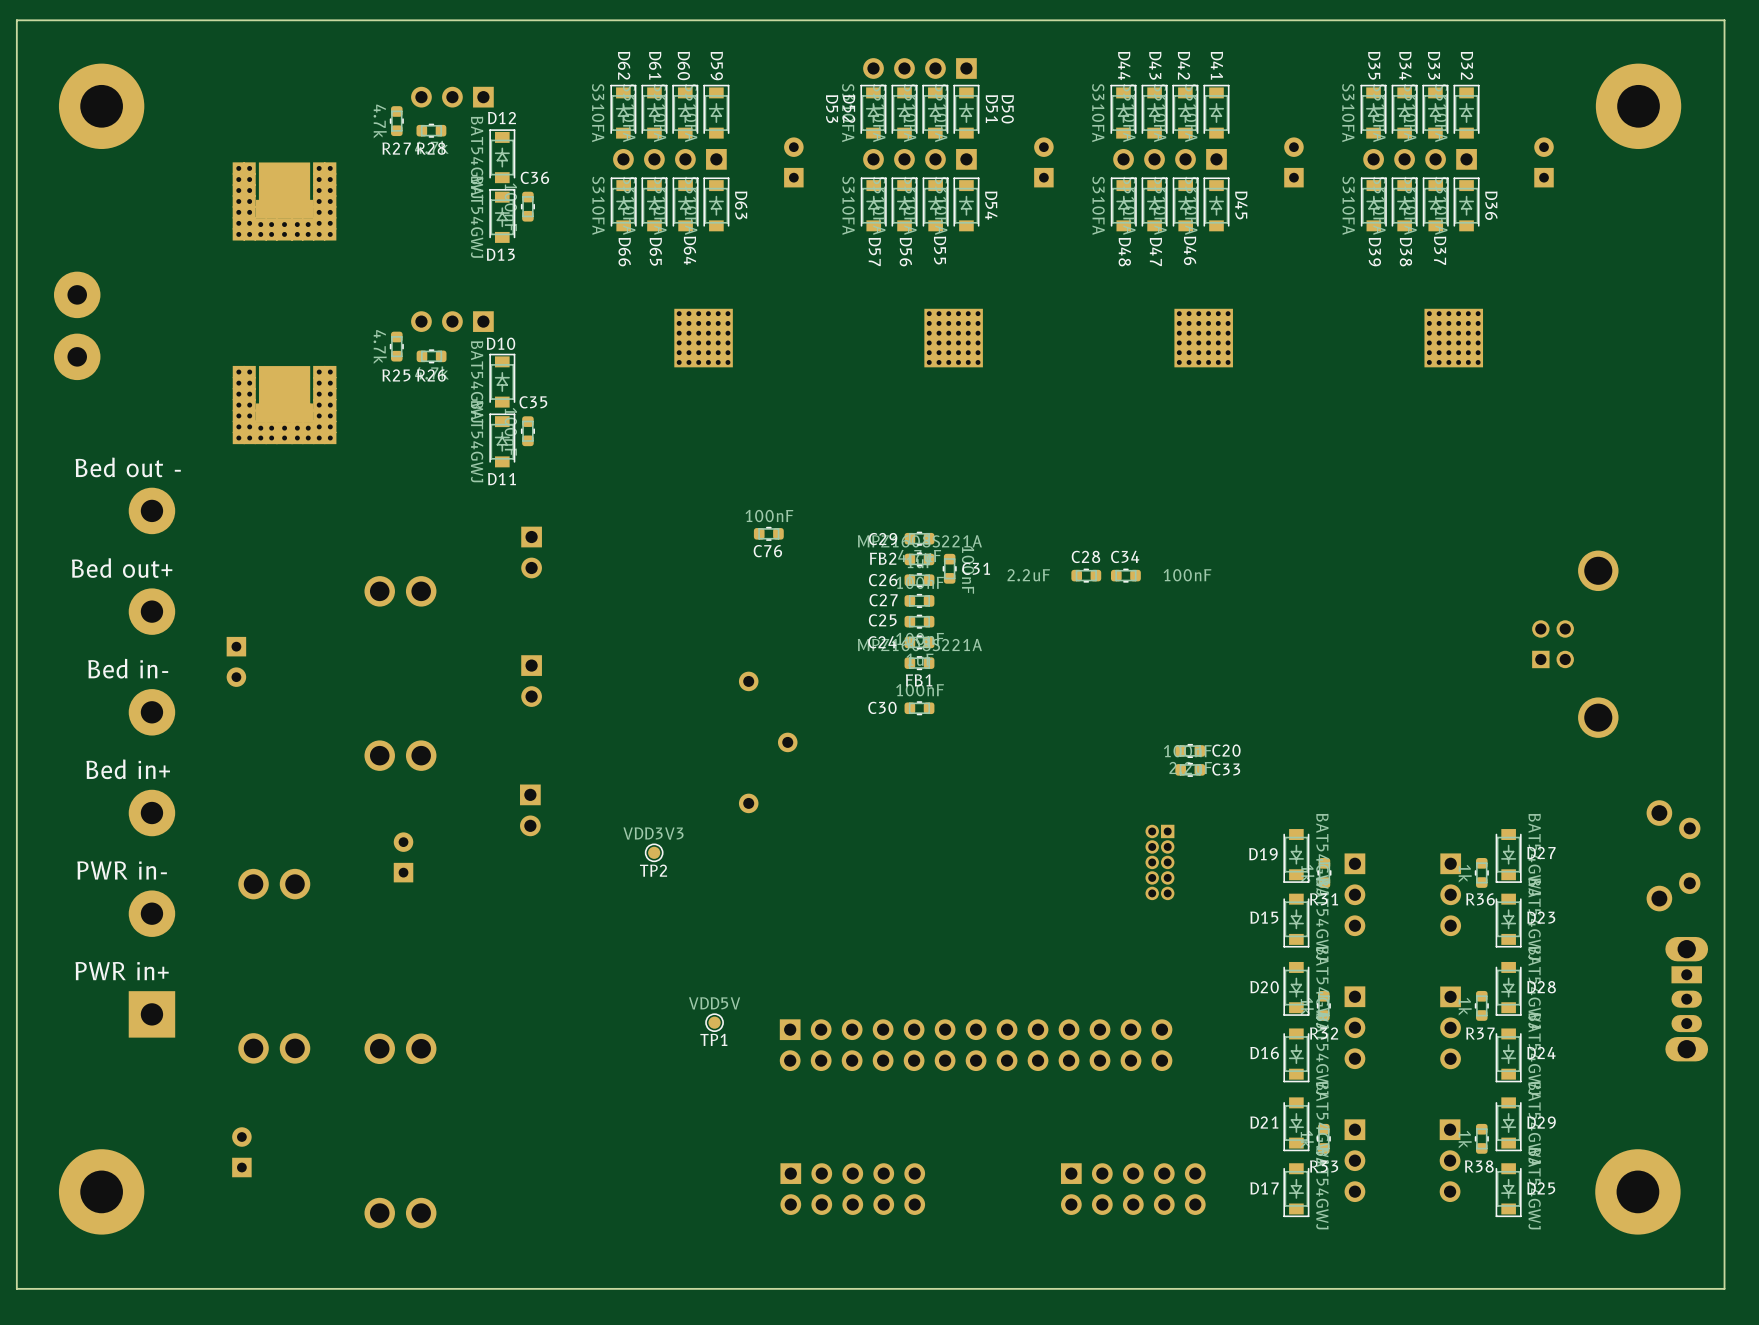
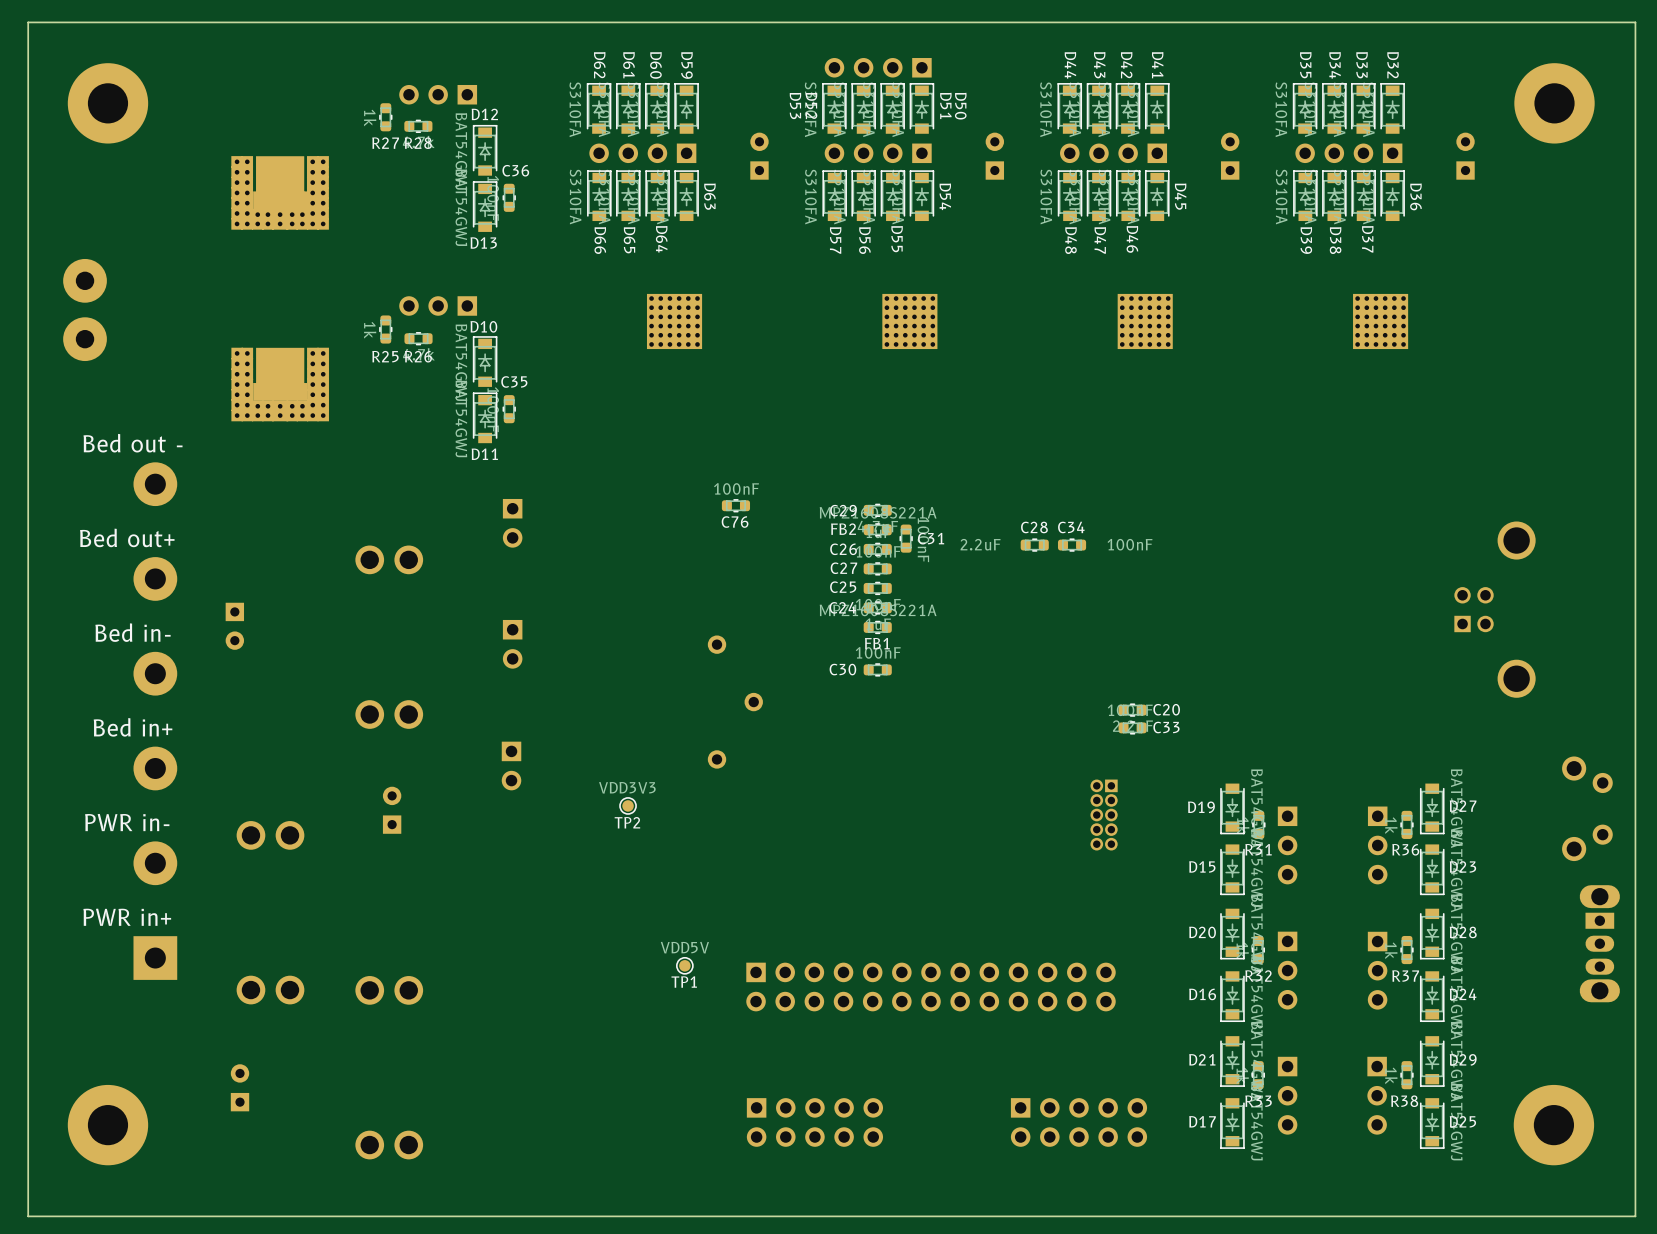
R27 value: 4.7k (380, 121) -> 1k (370, 118)
R25 value: 4.7k (380, 347) -> 1k (370, 330)

